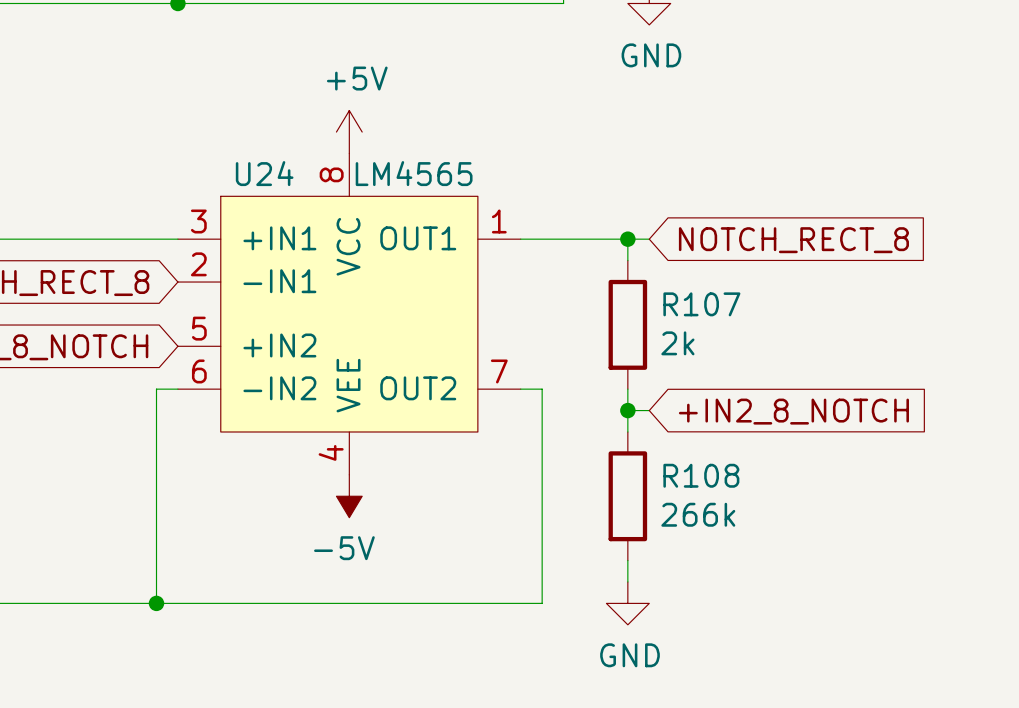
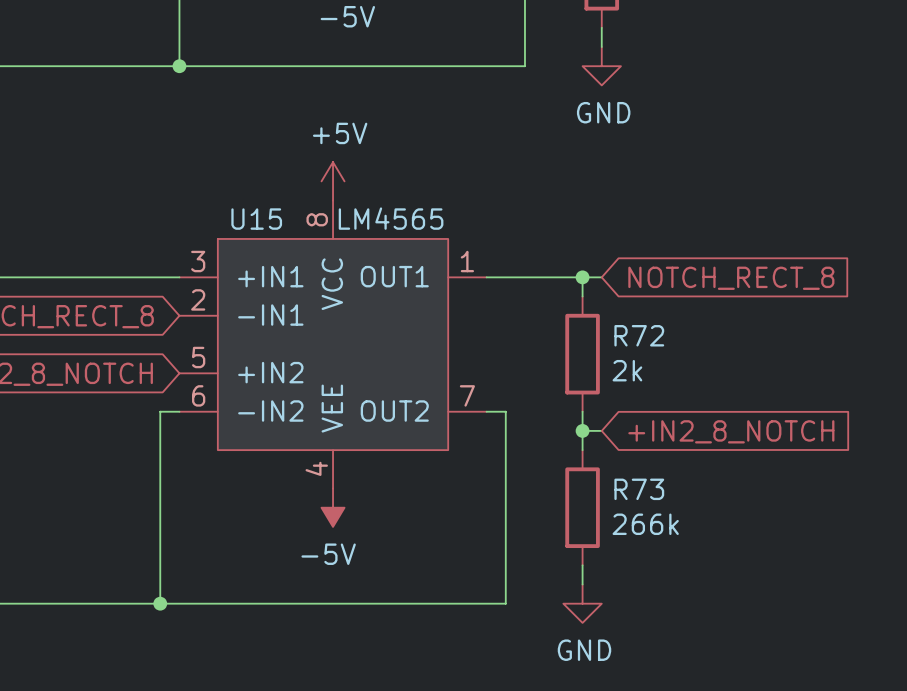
U24 name: U24 (264, 173) -> U15 (256, 219)
R107 name: R107 (701, 304) -> R72 (639, 335)
R108 name: R108 (701, 475) -> R73 (639, 489)

